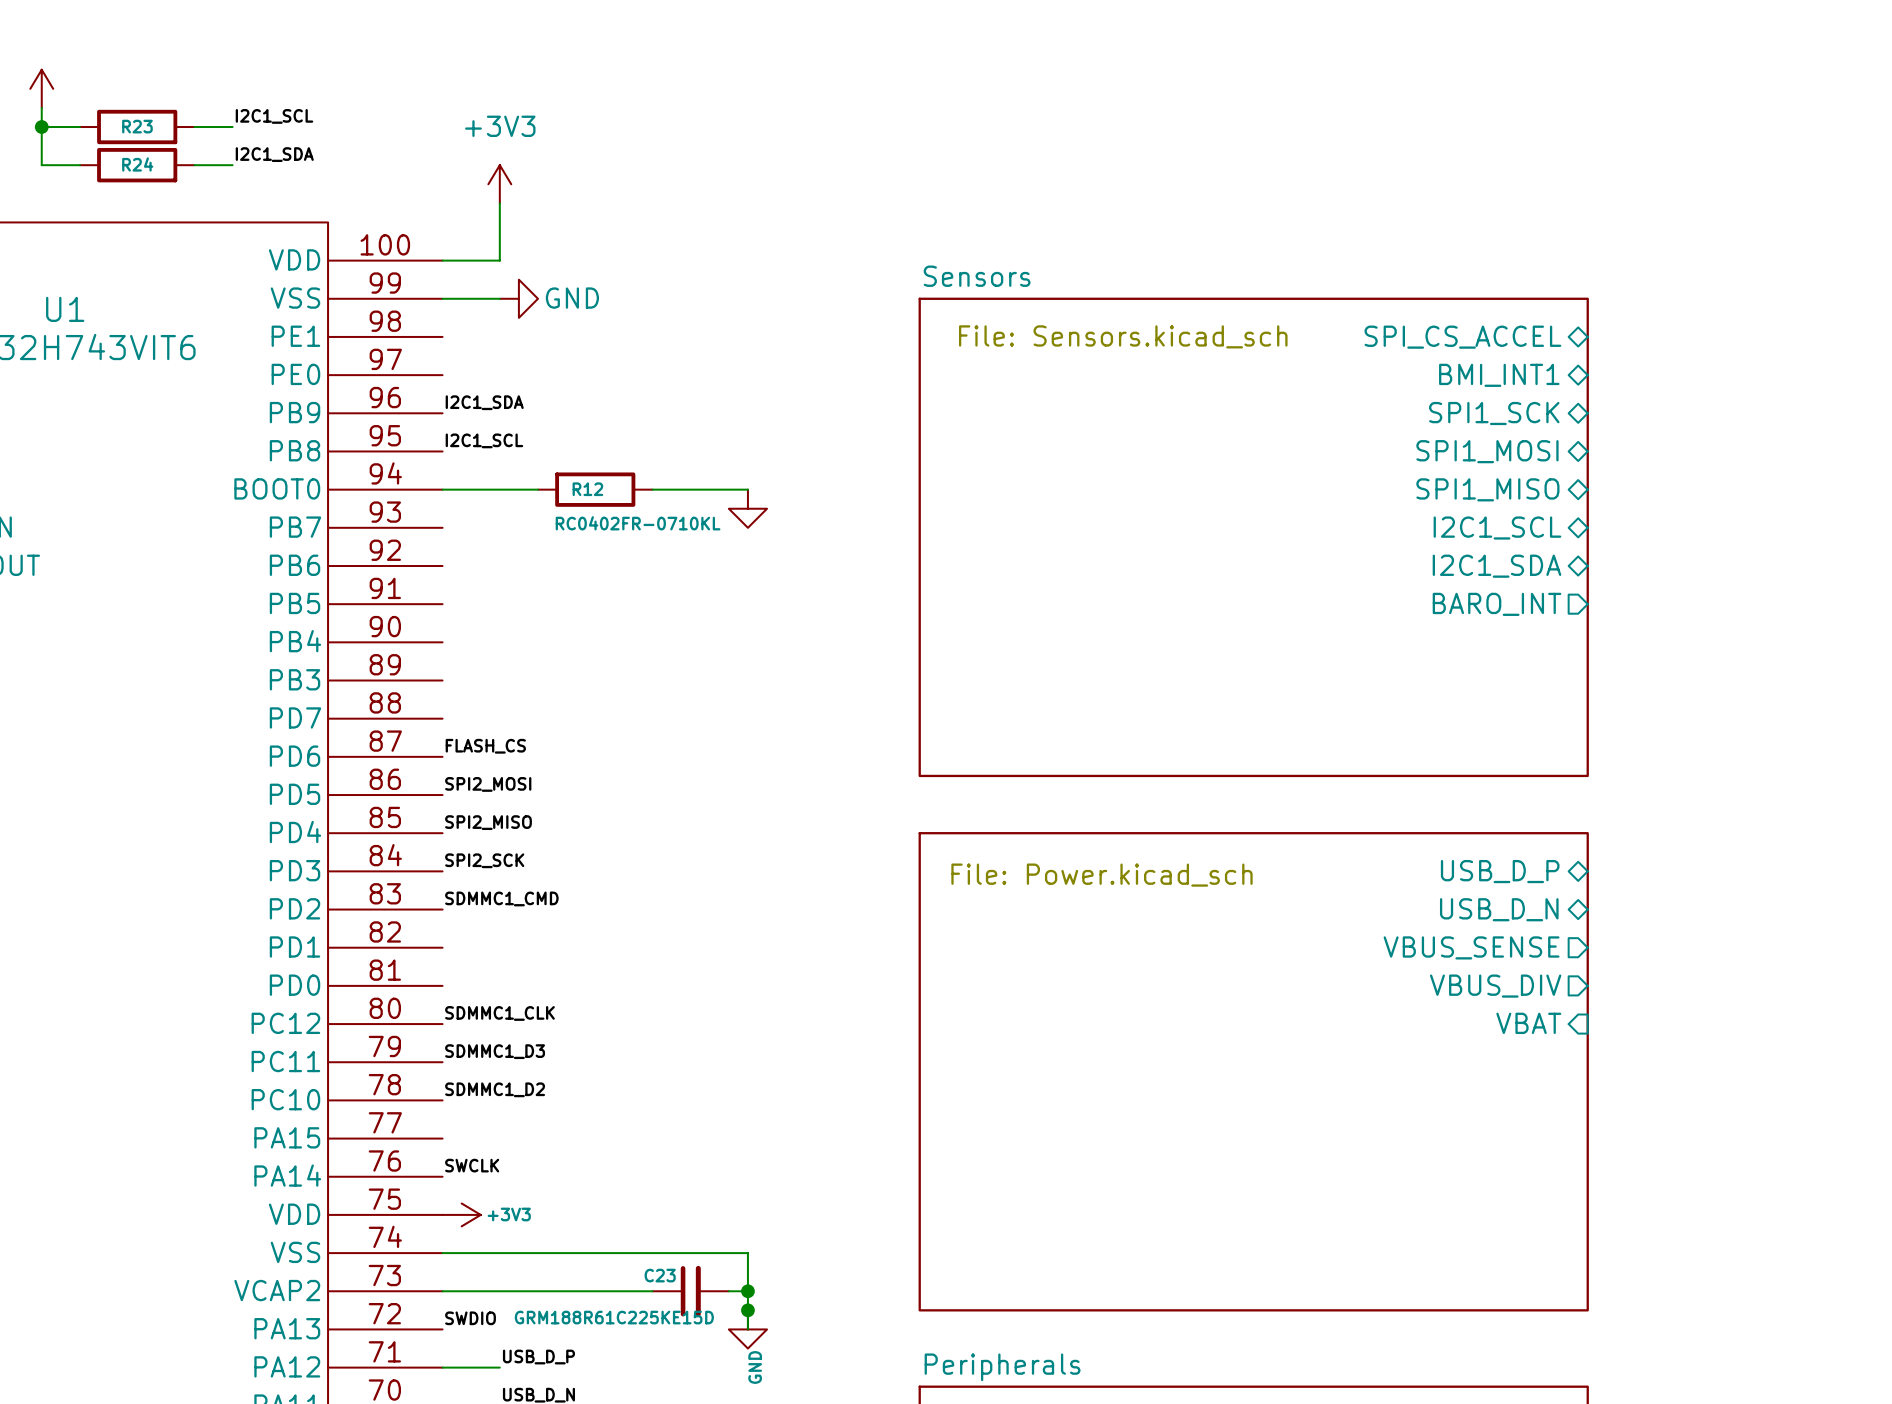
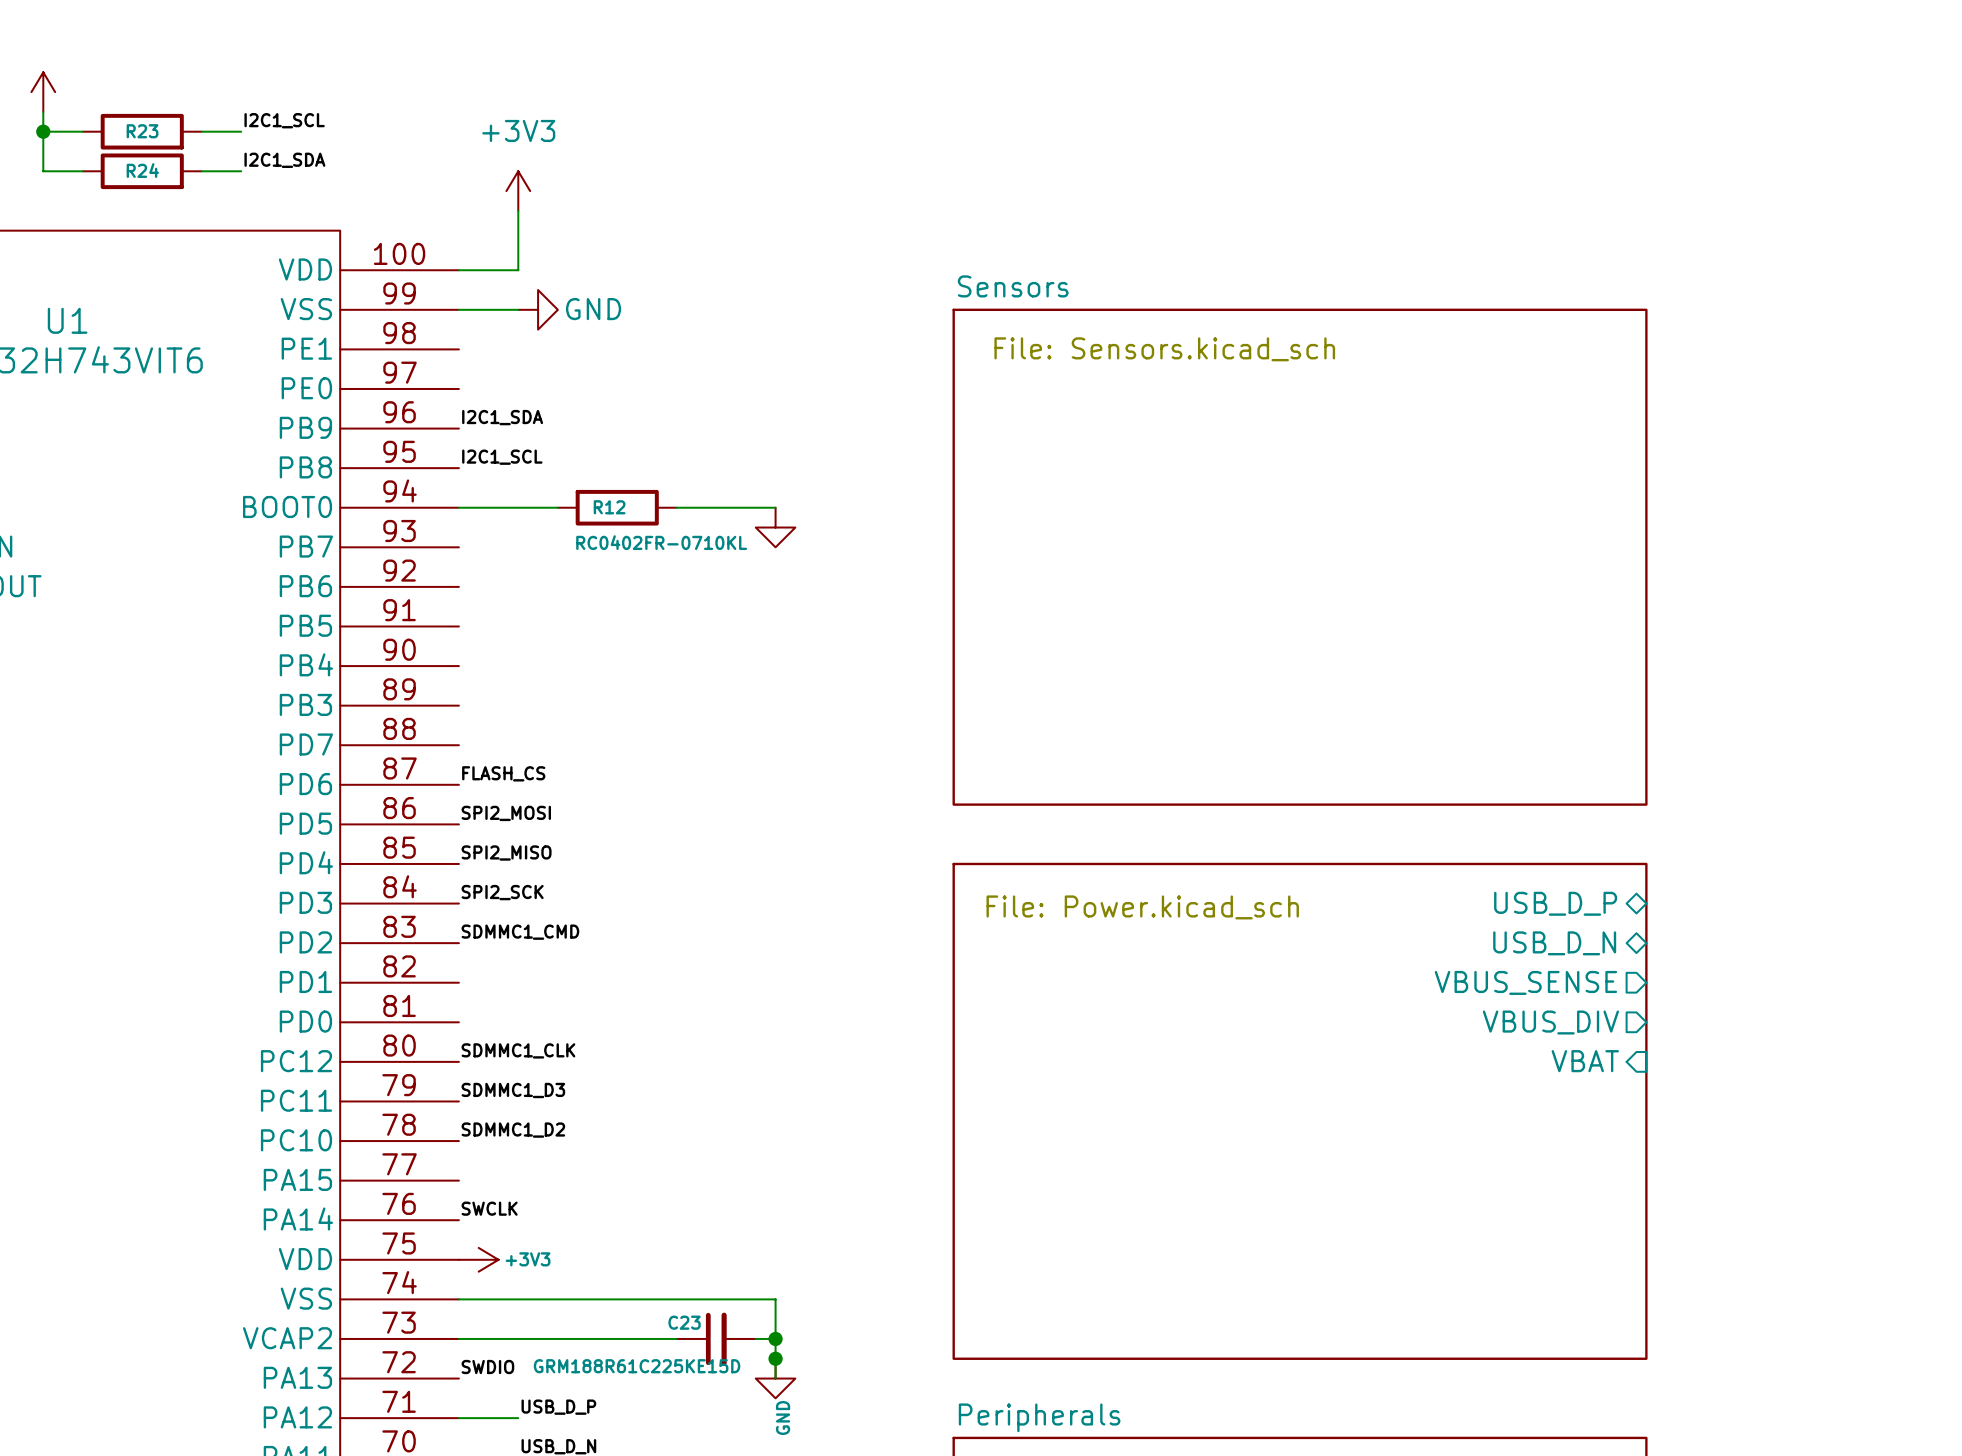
sheet pin: SPI_CS_ACCEL (1462, 337) -> none
sheet pin: BMI_INT1 (1499, 375) -> none
sheet pin: SPI1_SCK (1494, 413) -> none
sheet pin: SPI1_MOSI (1487, 451) -> none
sheet pin: SPI1_MISO (1487, 489) -> none
sheet pin: I2C1_SCL (1497, 528) -> none
sheet pin: I2C1_SDA (1497, 566) -> none
sheet pin: BARO_INT (1497, 604) -> none

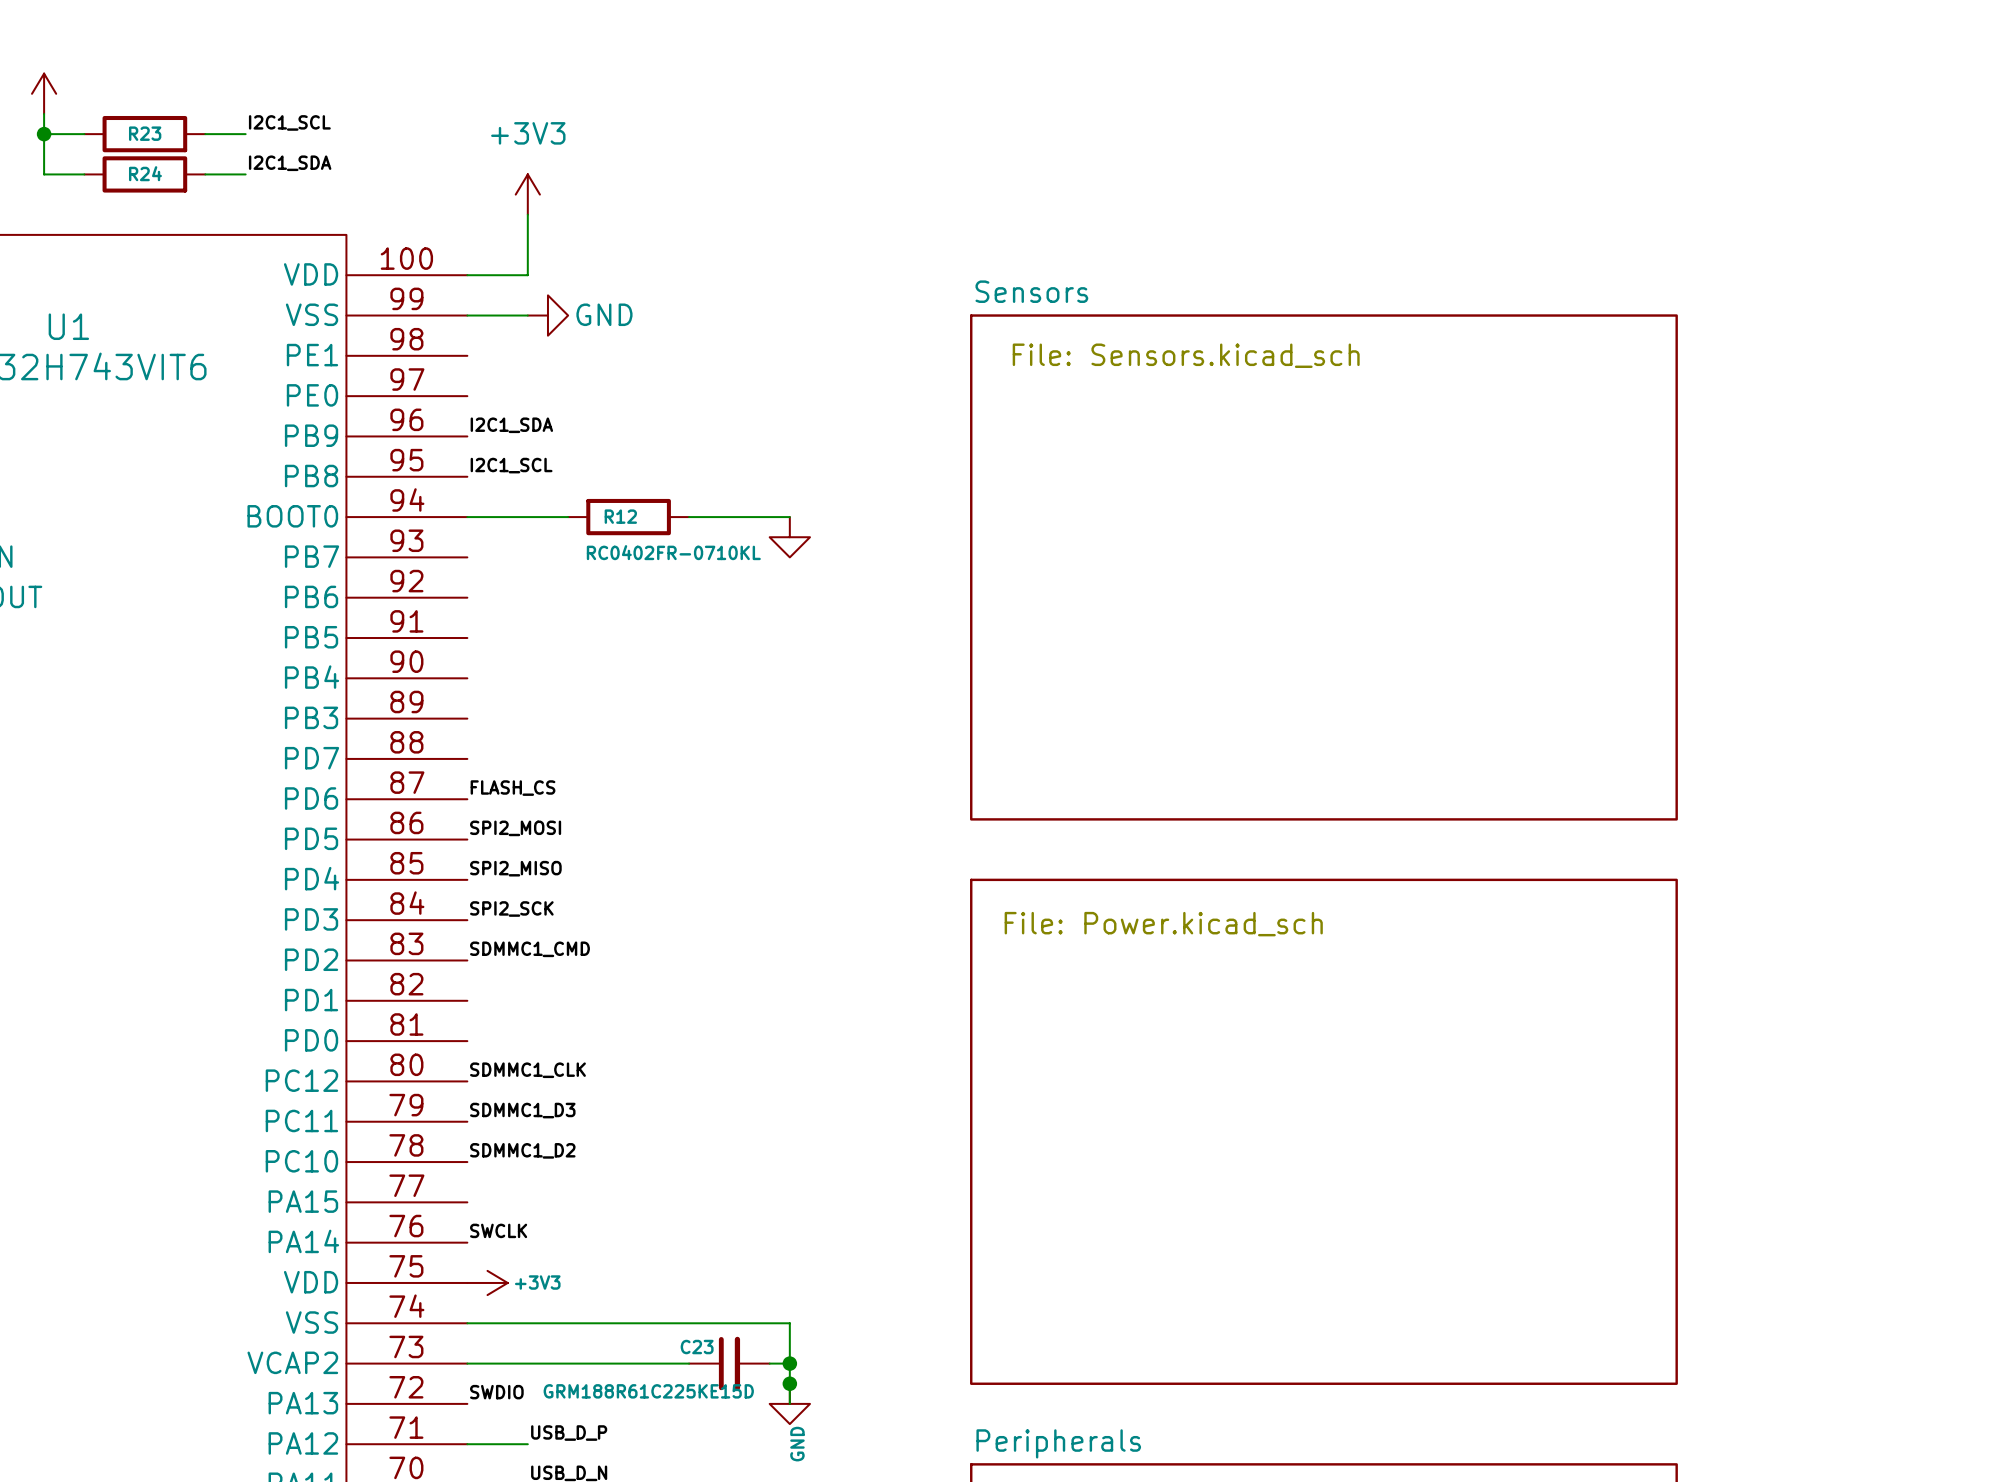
sheet pin: USB_D_P (1555, 903) -> none
sheet pin: USB_D_N (1554, 943) -> none
sheet pin: VBUS_SENSE (1525, 982) -> none
sheet pin: VBUS_DIV (1550, 1022) -> none
sheet pin: VBAT (1585, 1061) -> none

